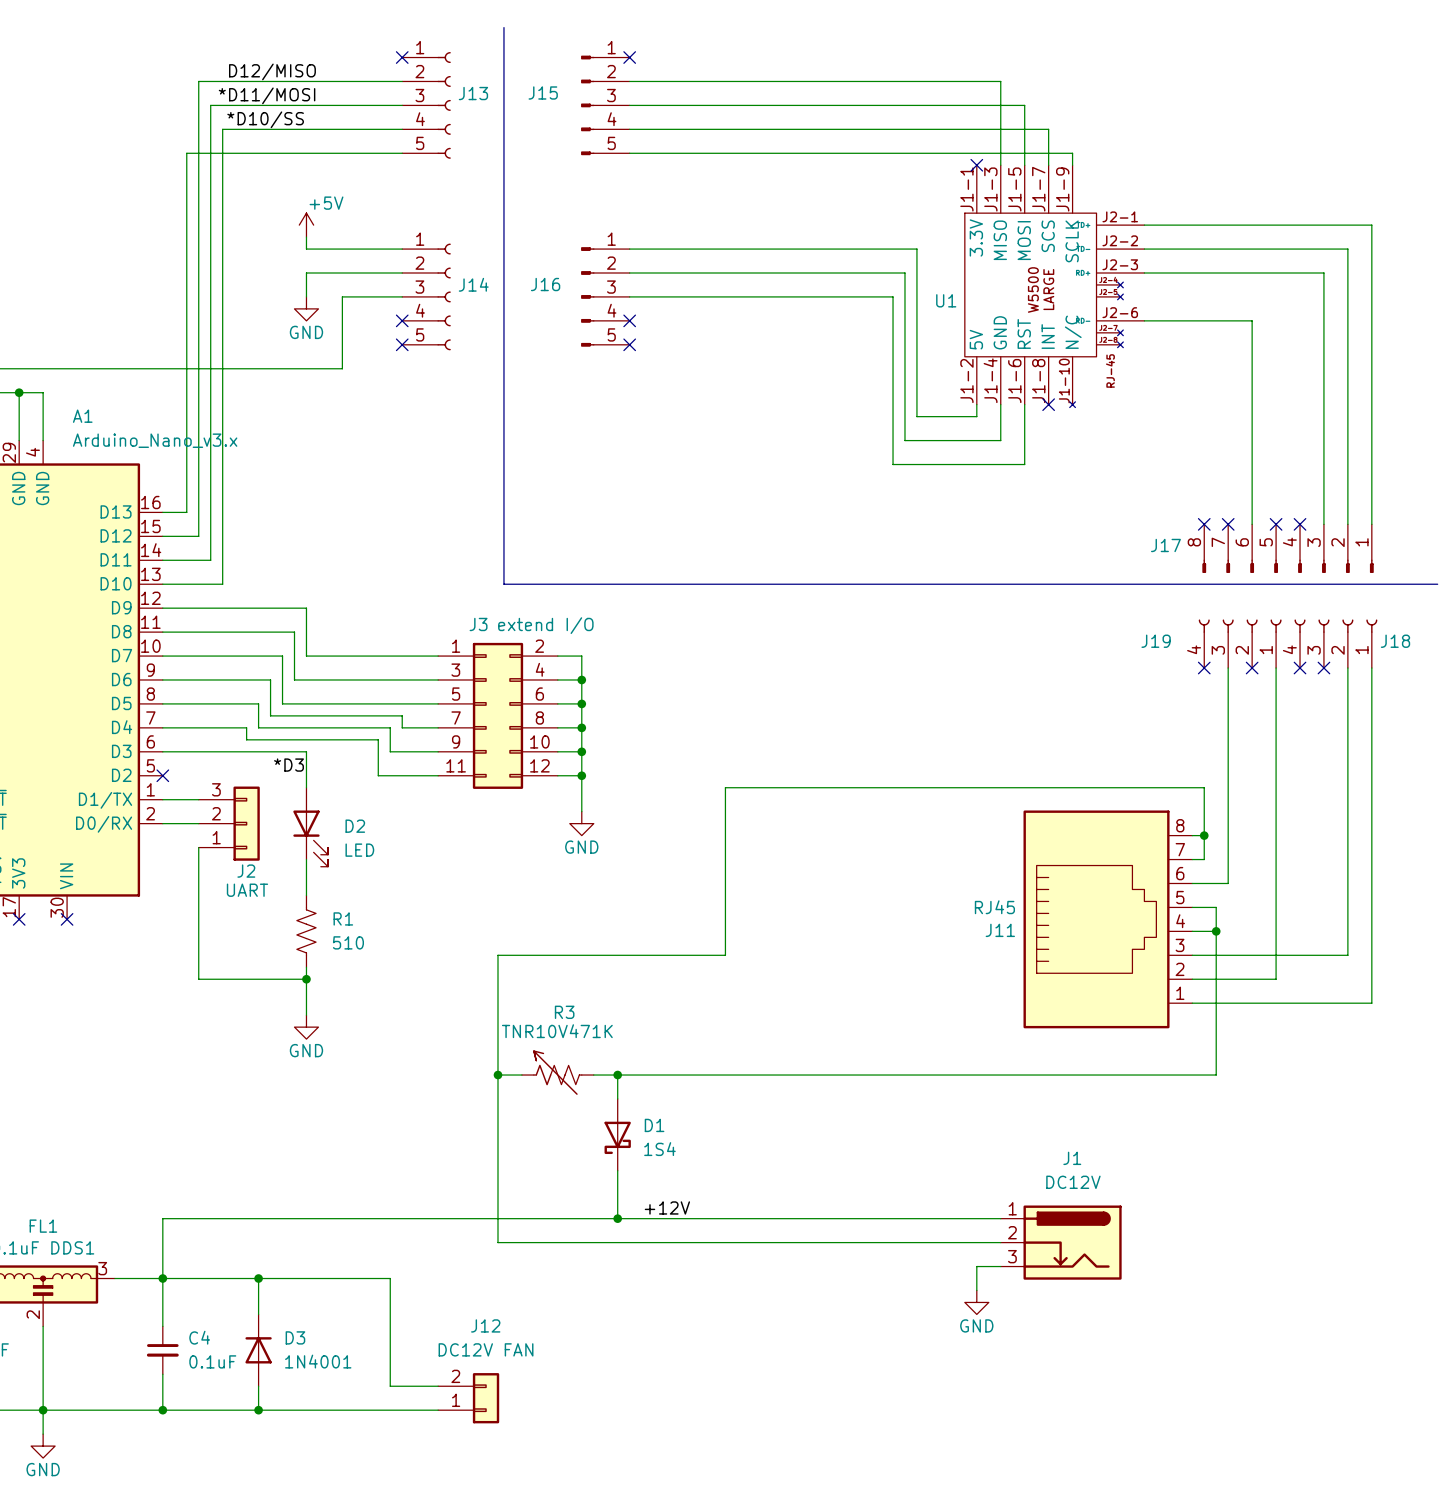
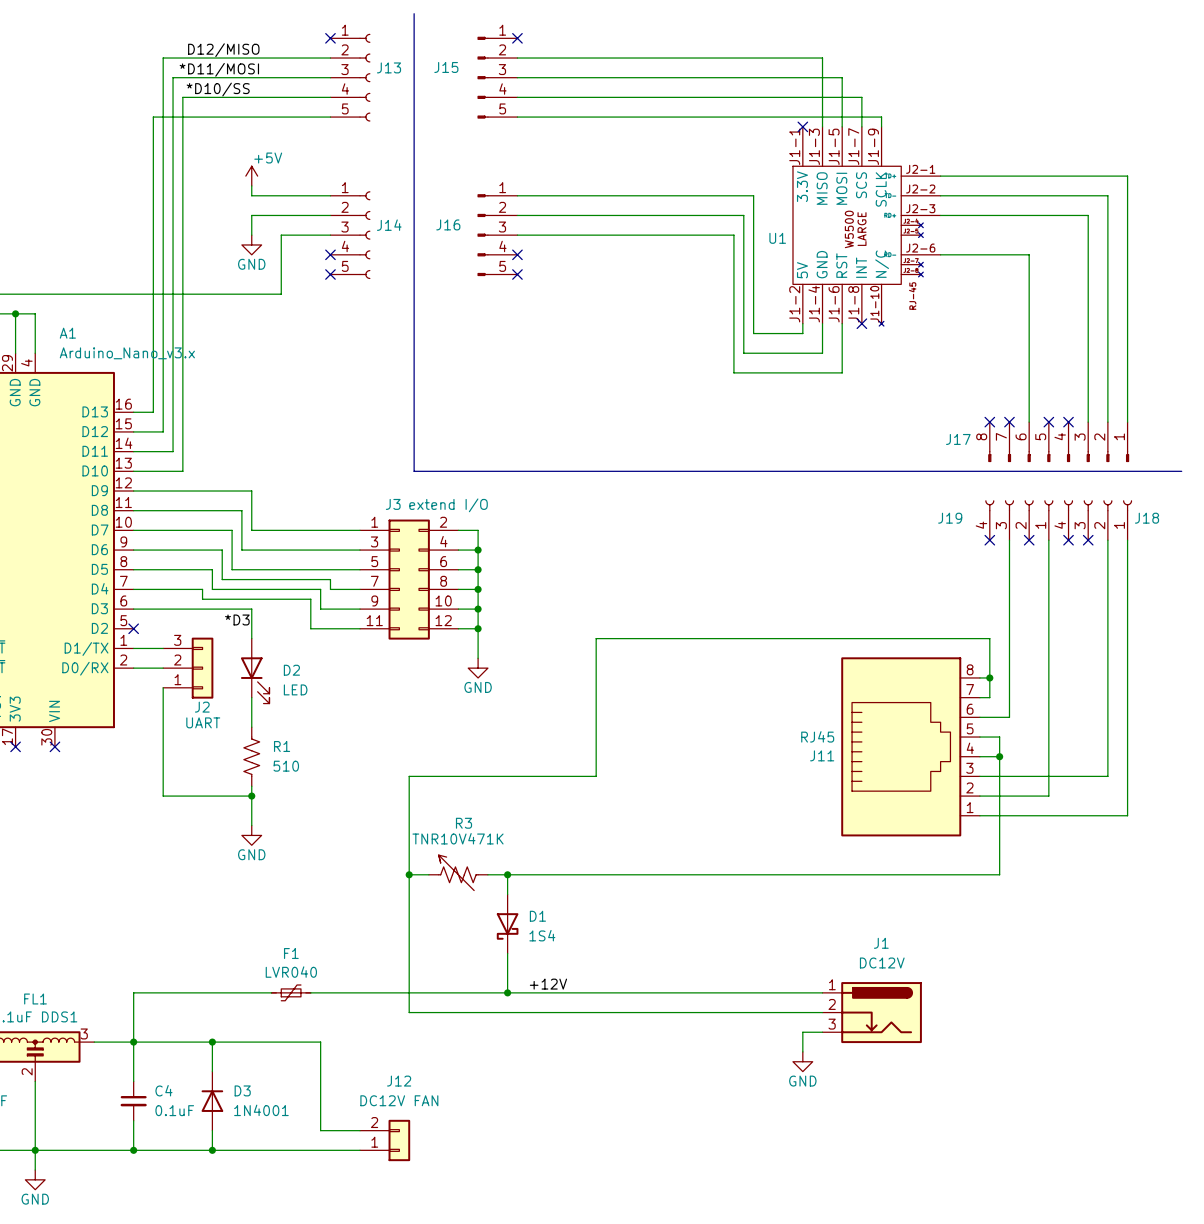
F1: none -> LVR040 (291, 992)

